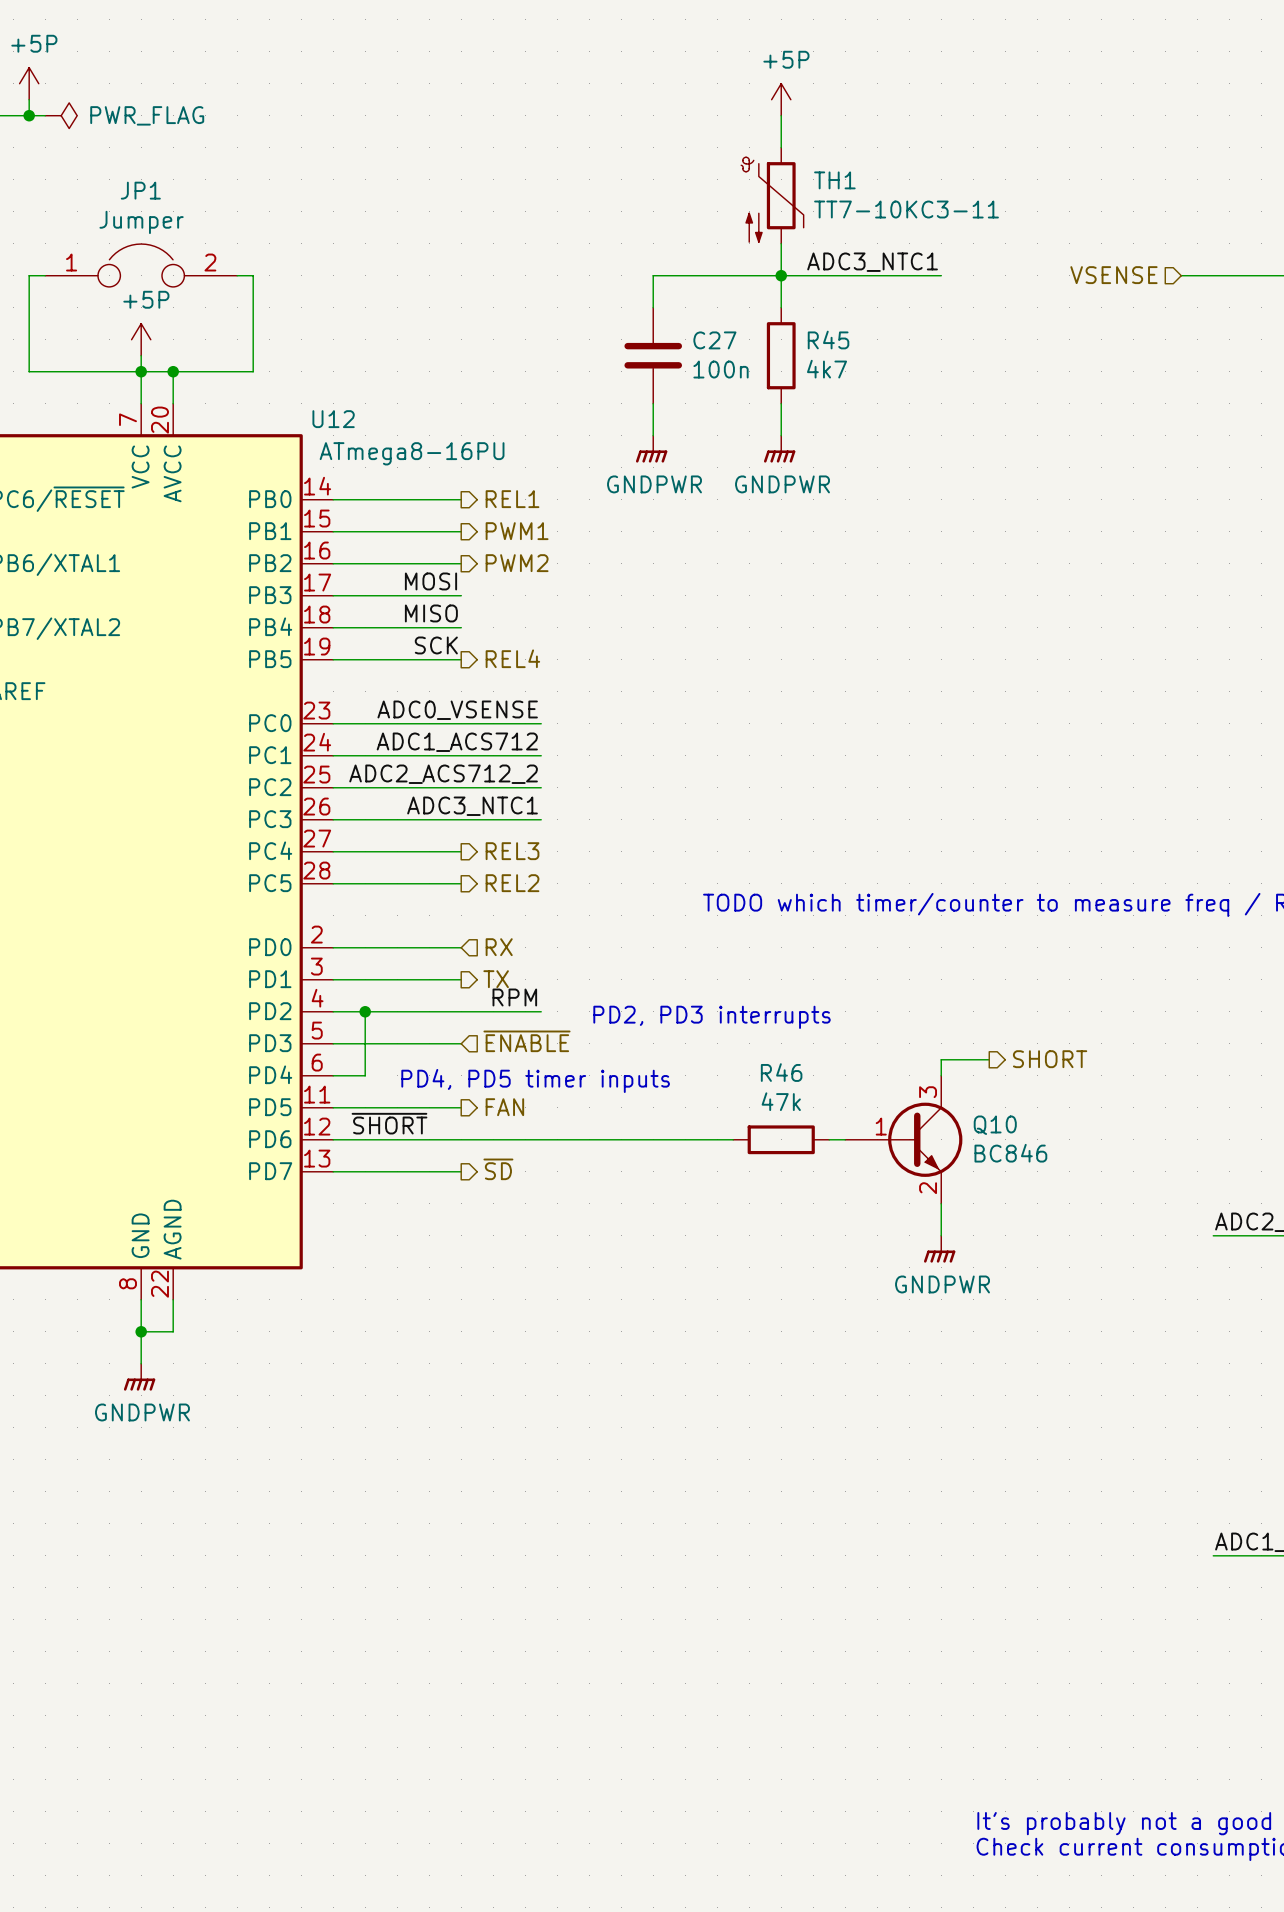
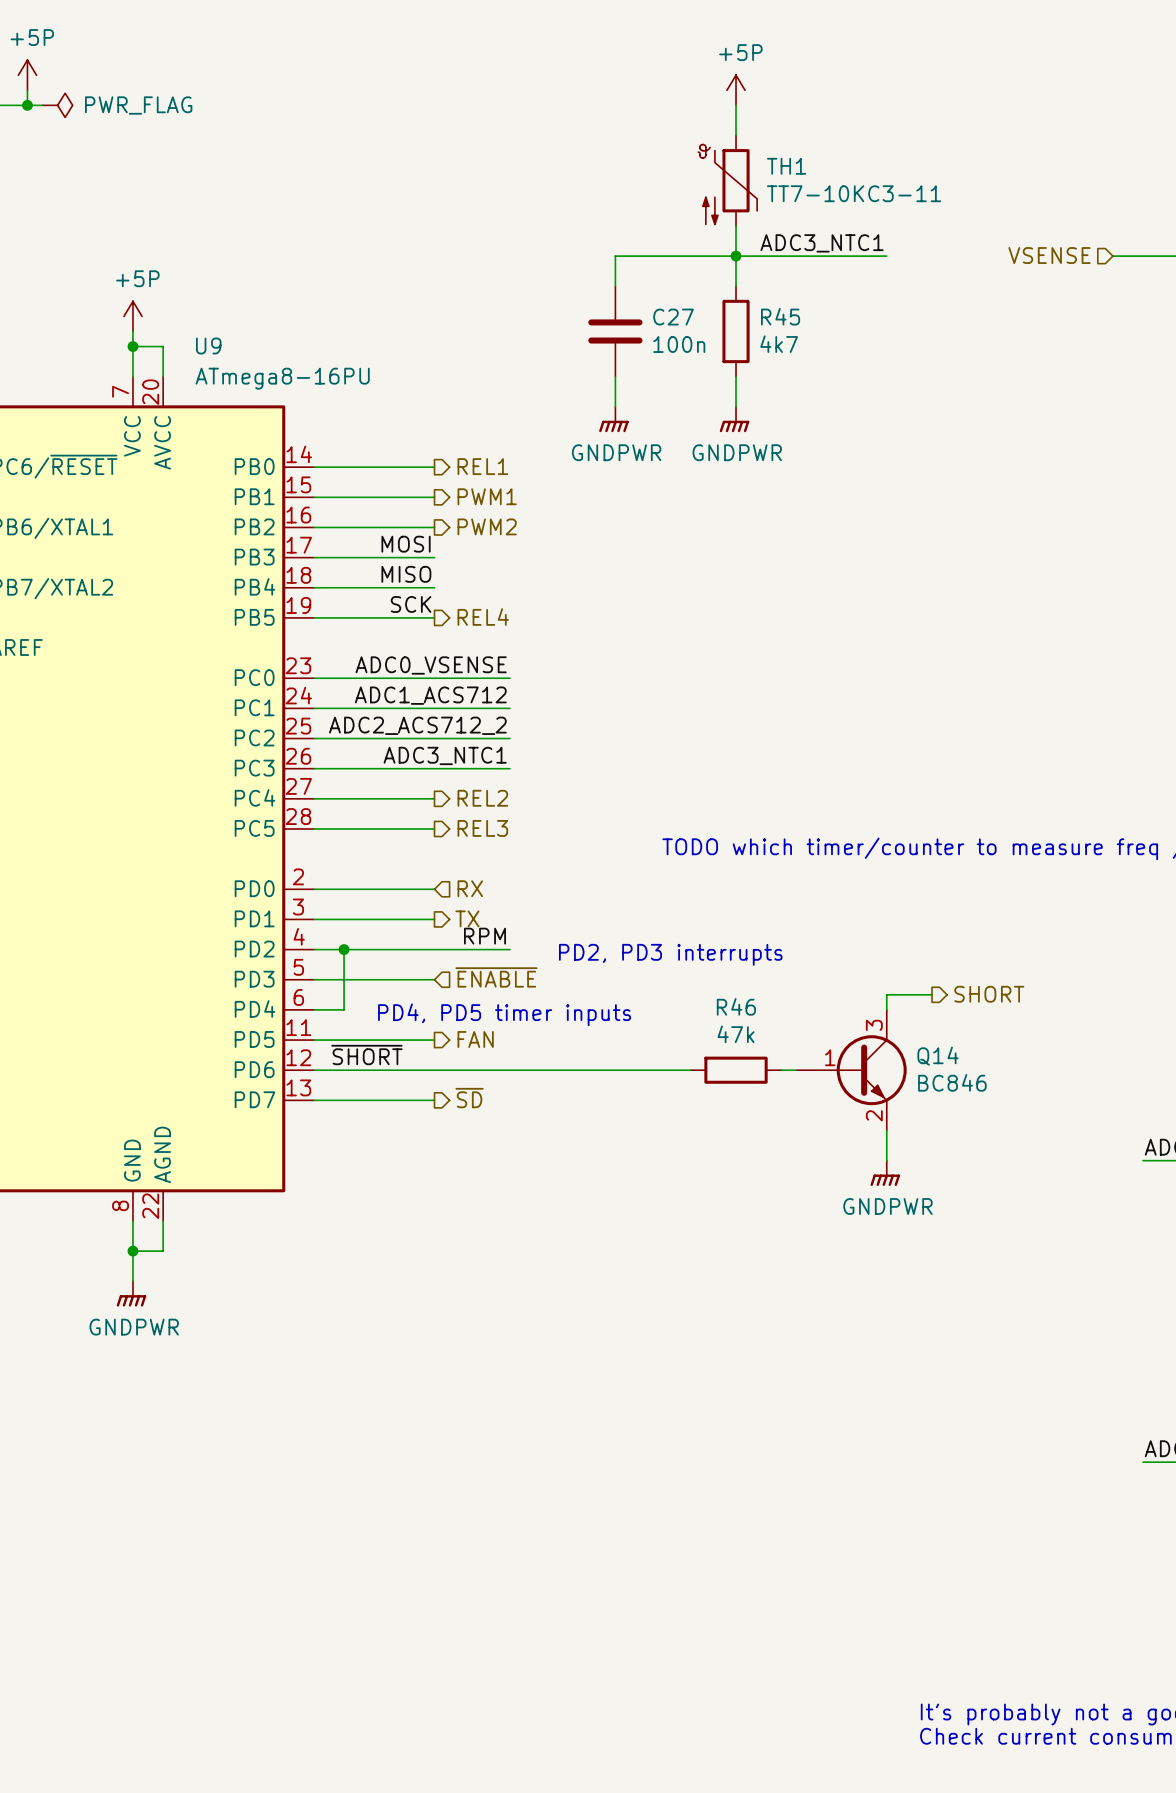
JP1: Jumper (141, 265) -> none
wire: (45, 275) (29, 275) (29, 371) (141, 371) -> none
wire: (237, 275) (253, 275) (253, 371) (173, 371) -> none
junction: (173, 371) -> none
U12 name: U12 (333, 419) -> U9 (208, 346)
U12 value position: ATmega8-16PU (412, 453) -> ATmega8-16PU (282, 378)
hierarchical label: REL3 (512, 851) -> REL2 (482, 798)
hierarchical label: REL2 (512, 883) -> REL3 (482, 828)
Q10 name: Q10 (995, 1125) -> Q14 (938, 1056)

